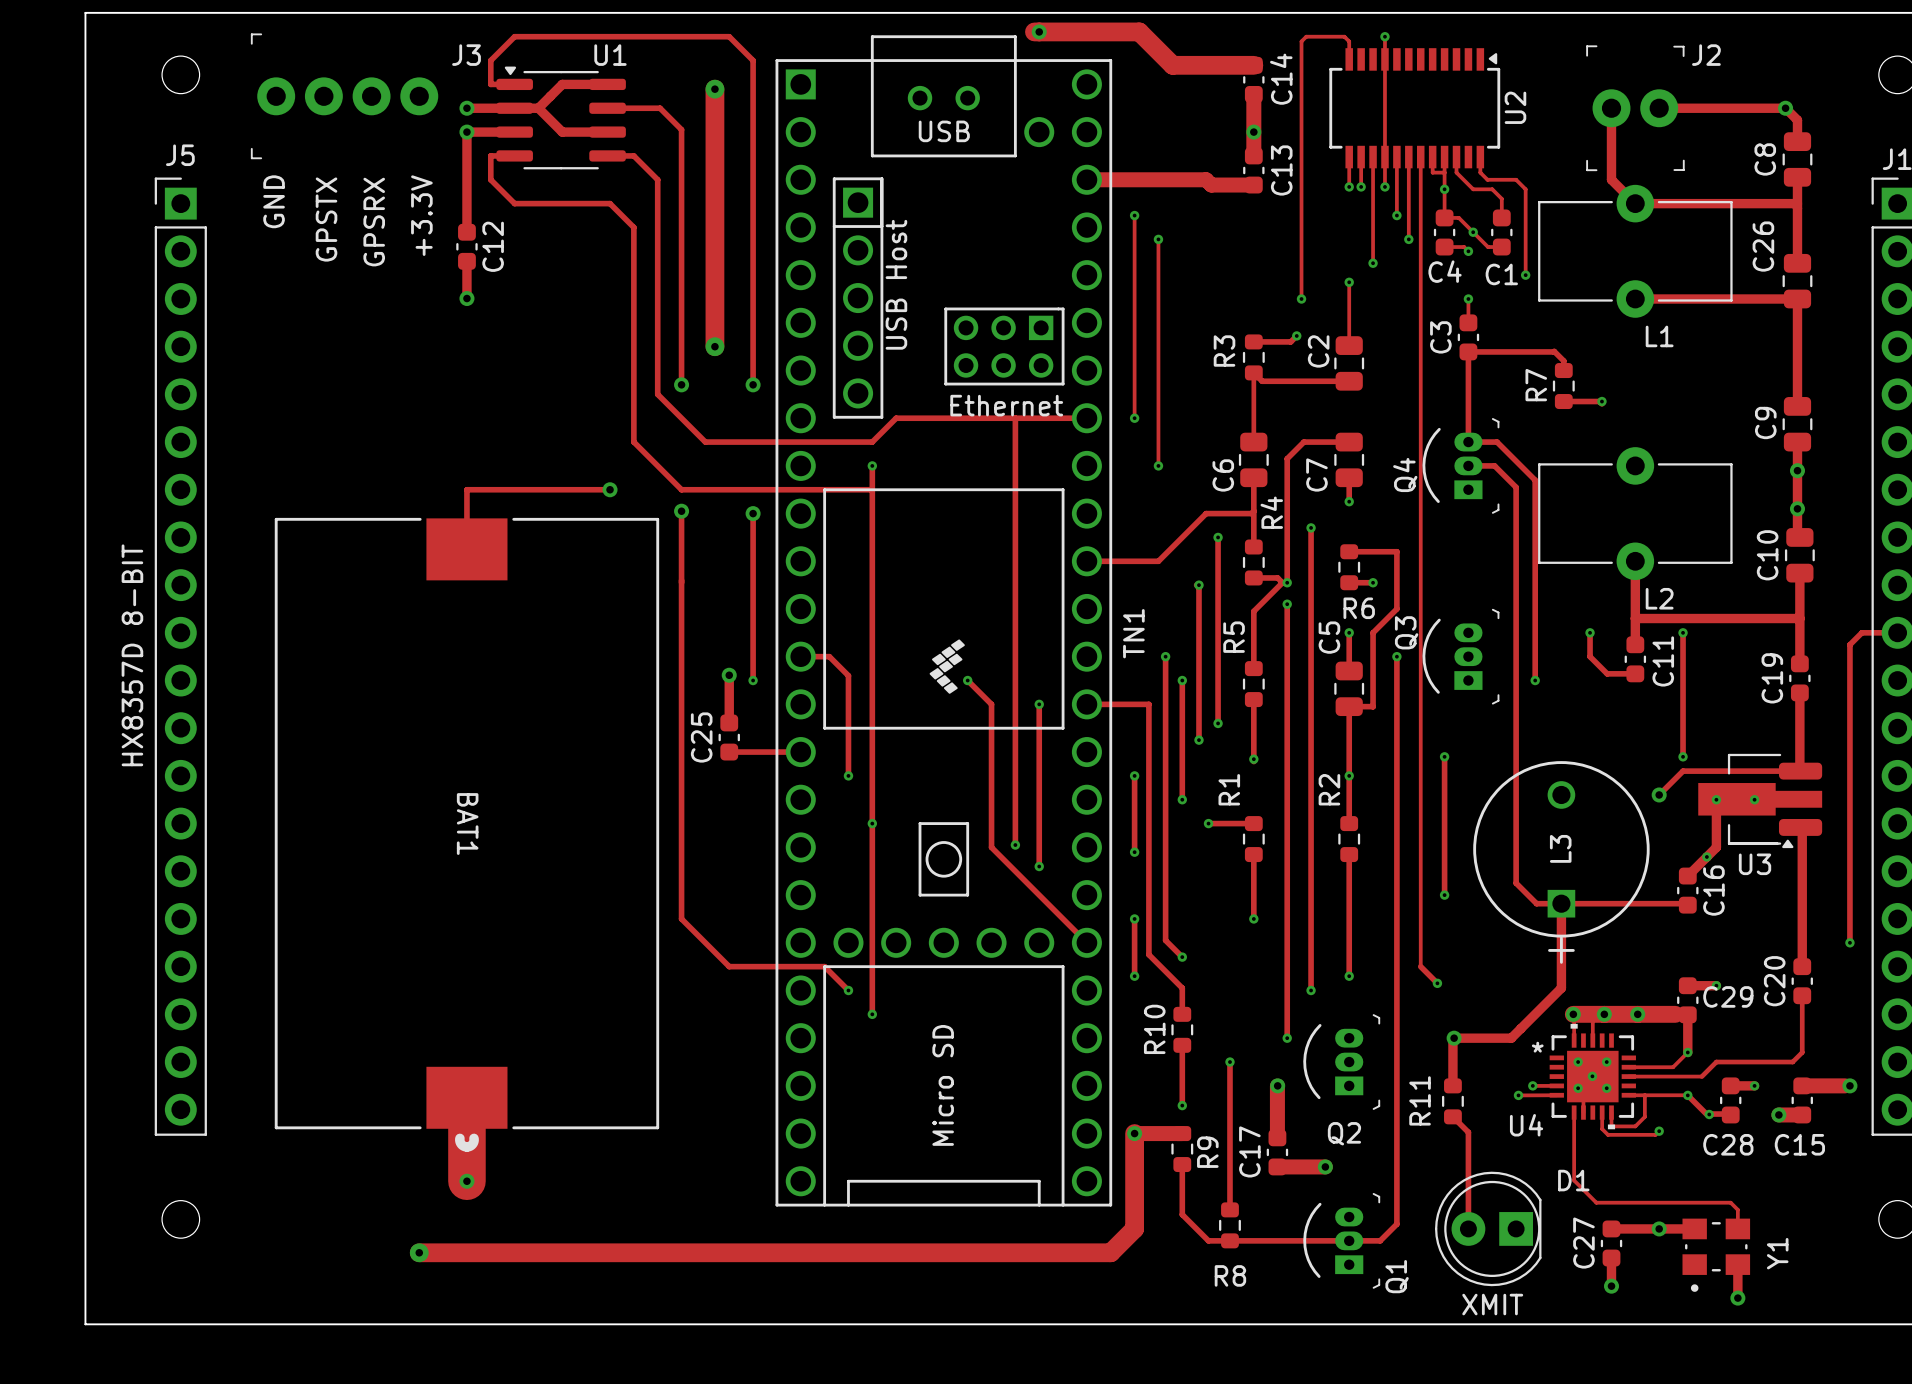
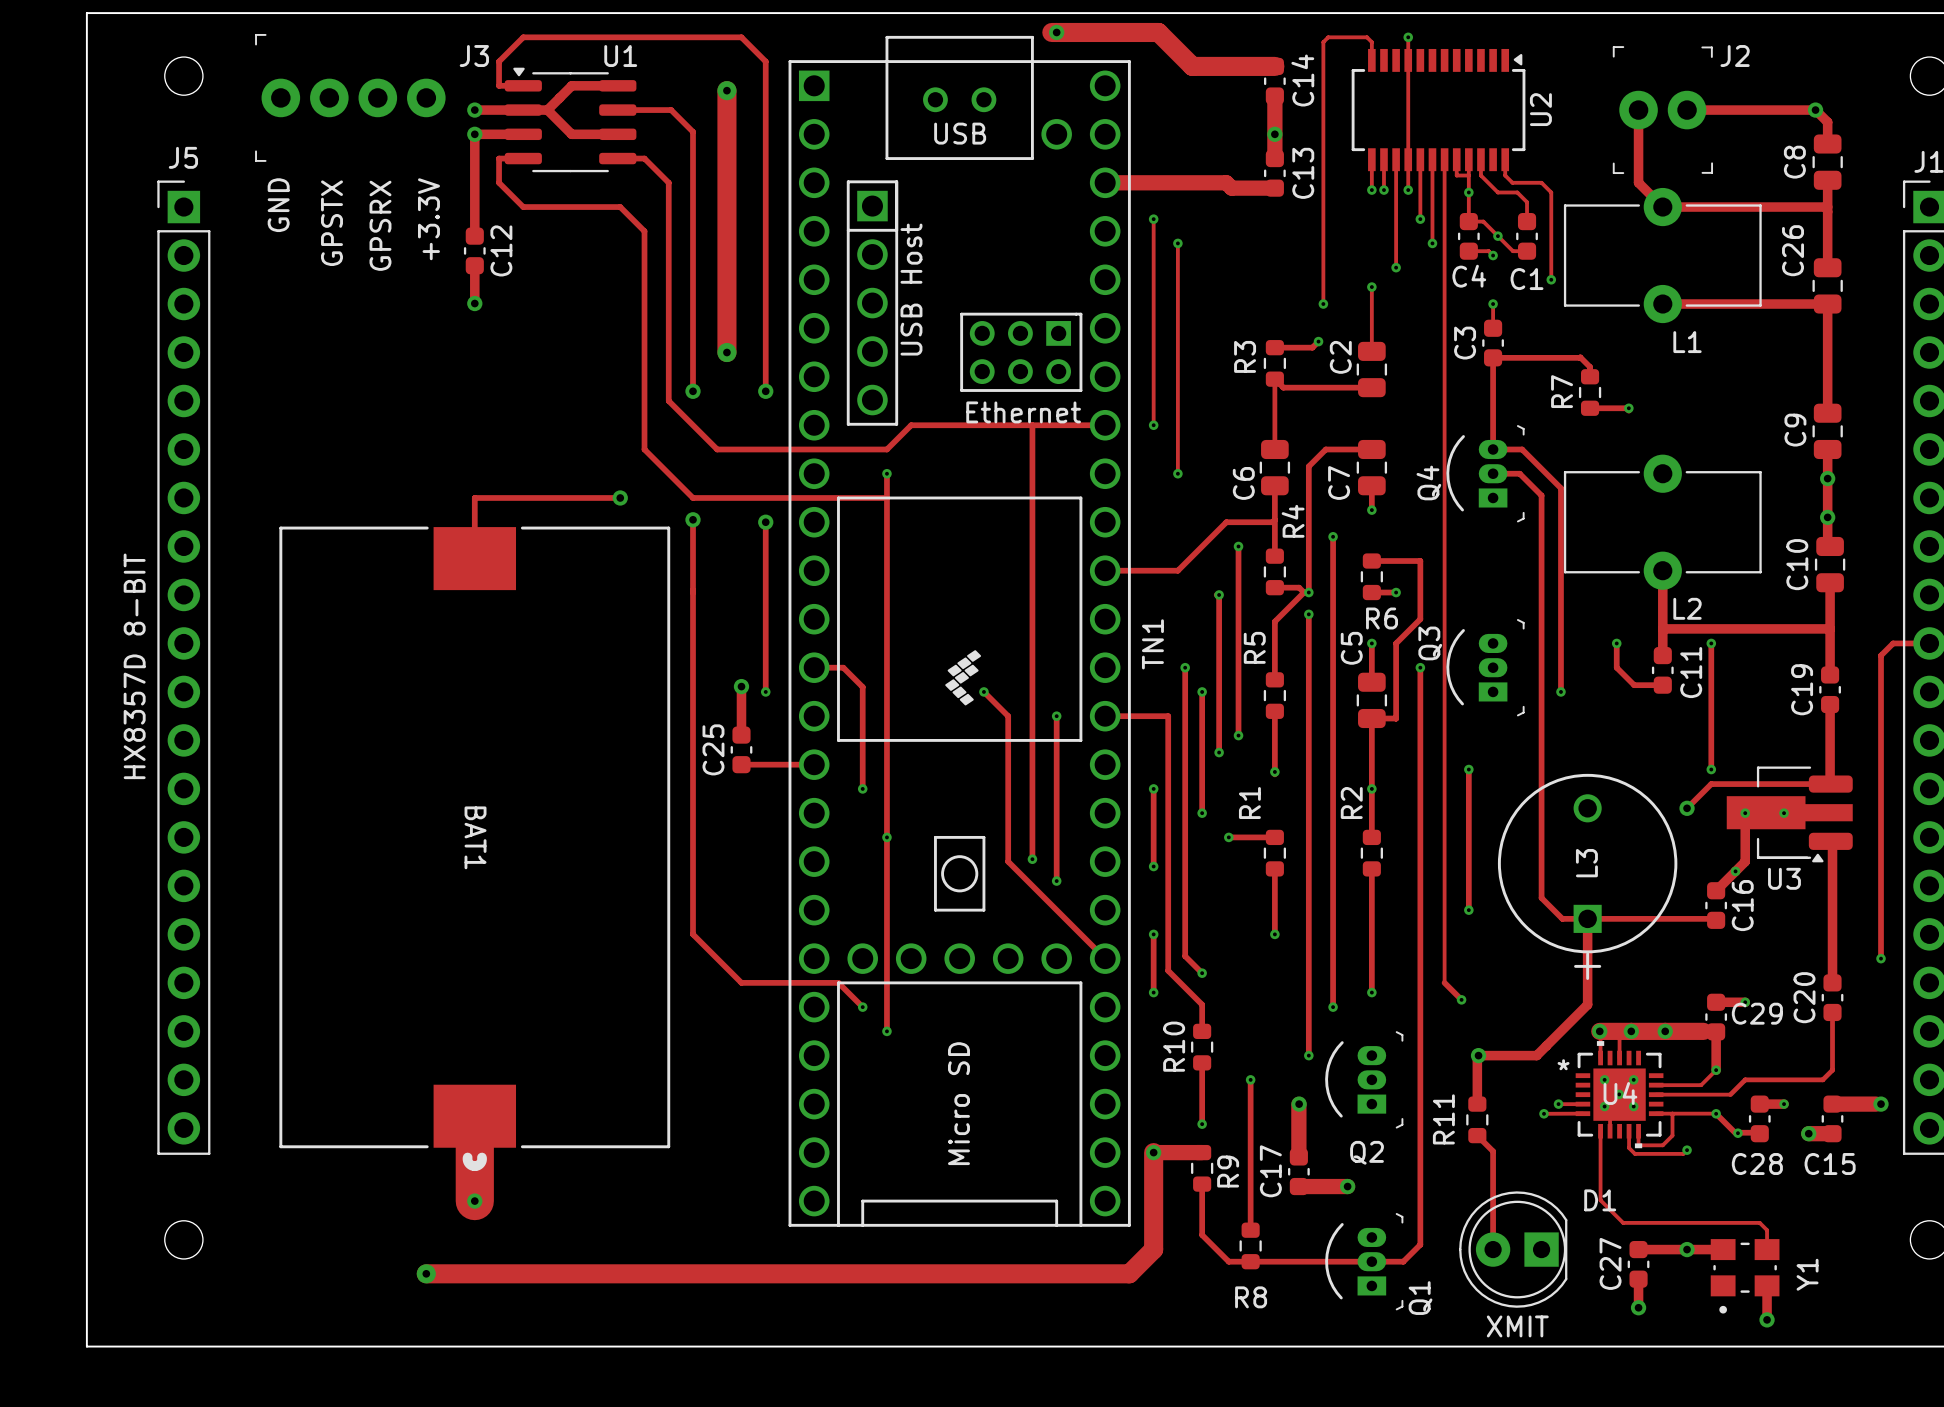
U4 name position: U4 (1526, 1125) -> U4 (1620, 1093)

